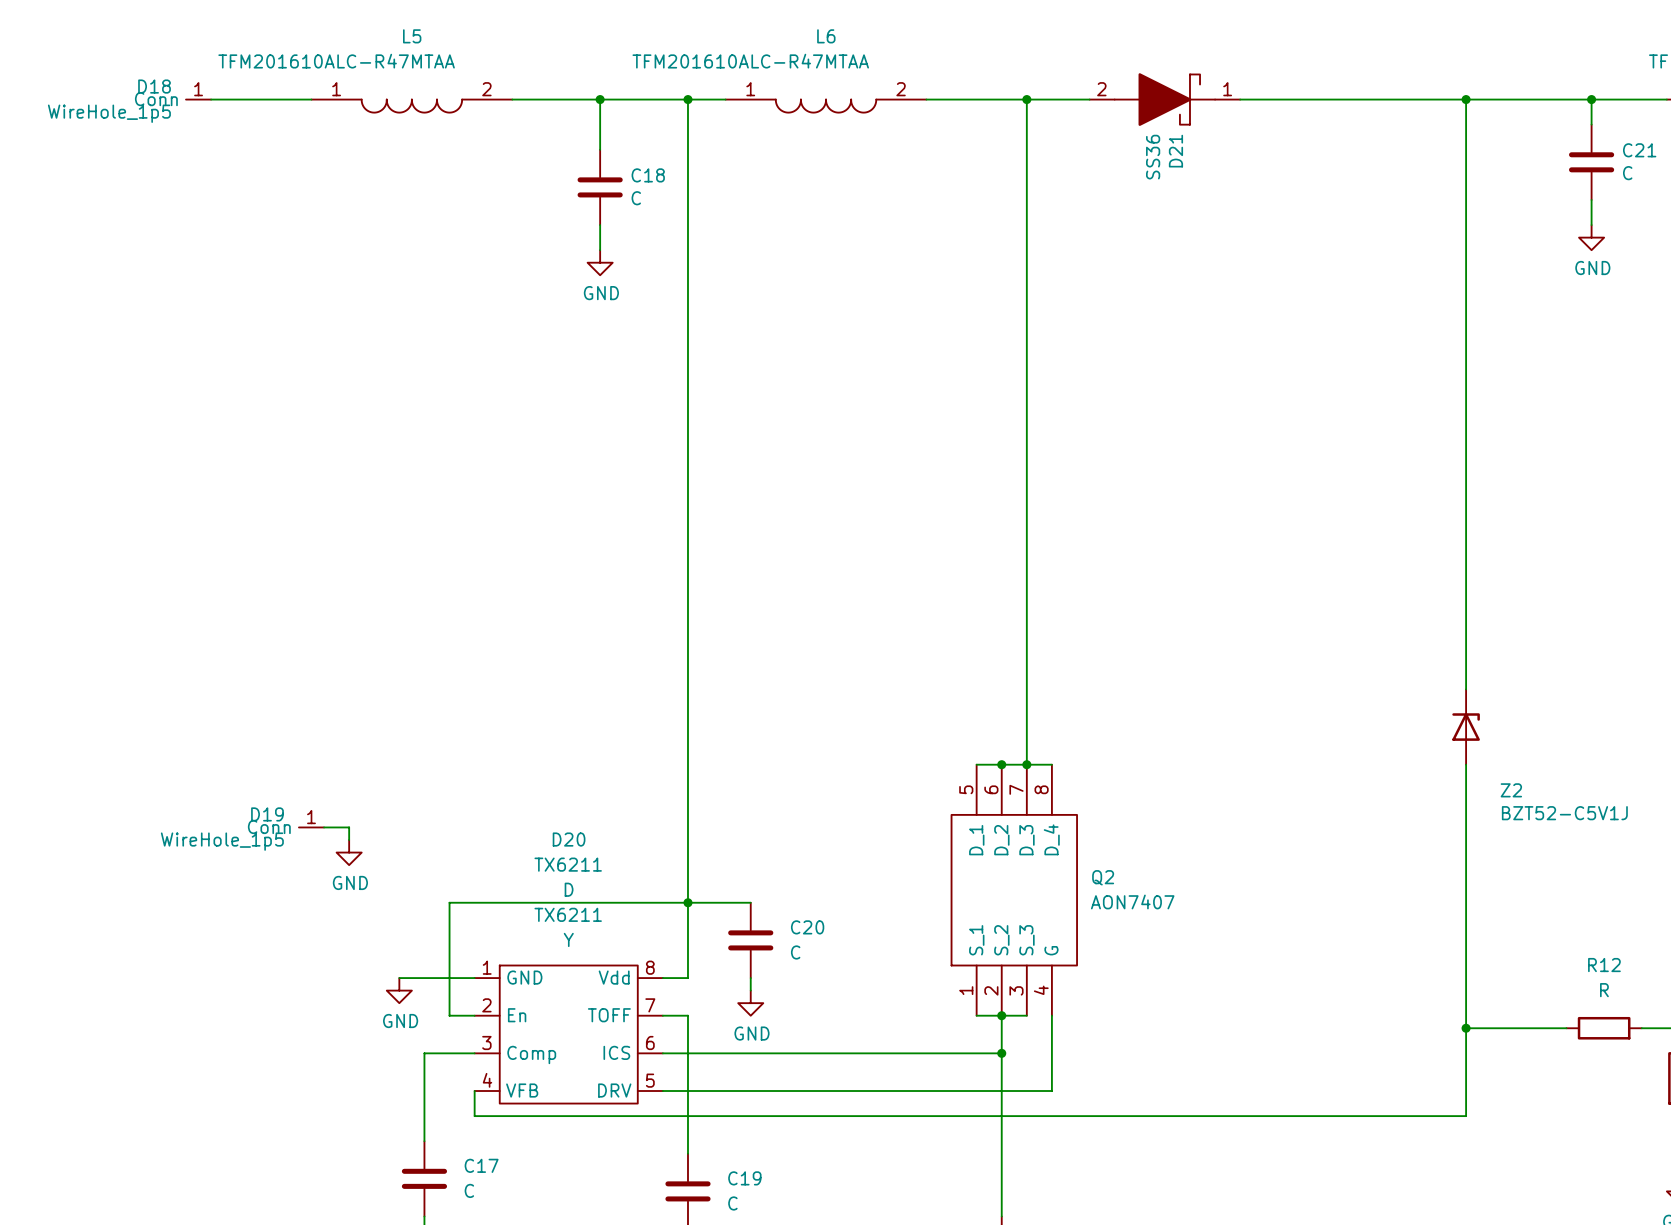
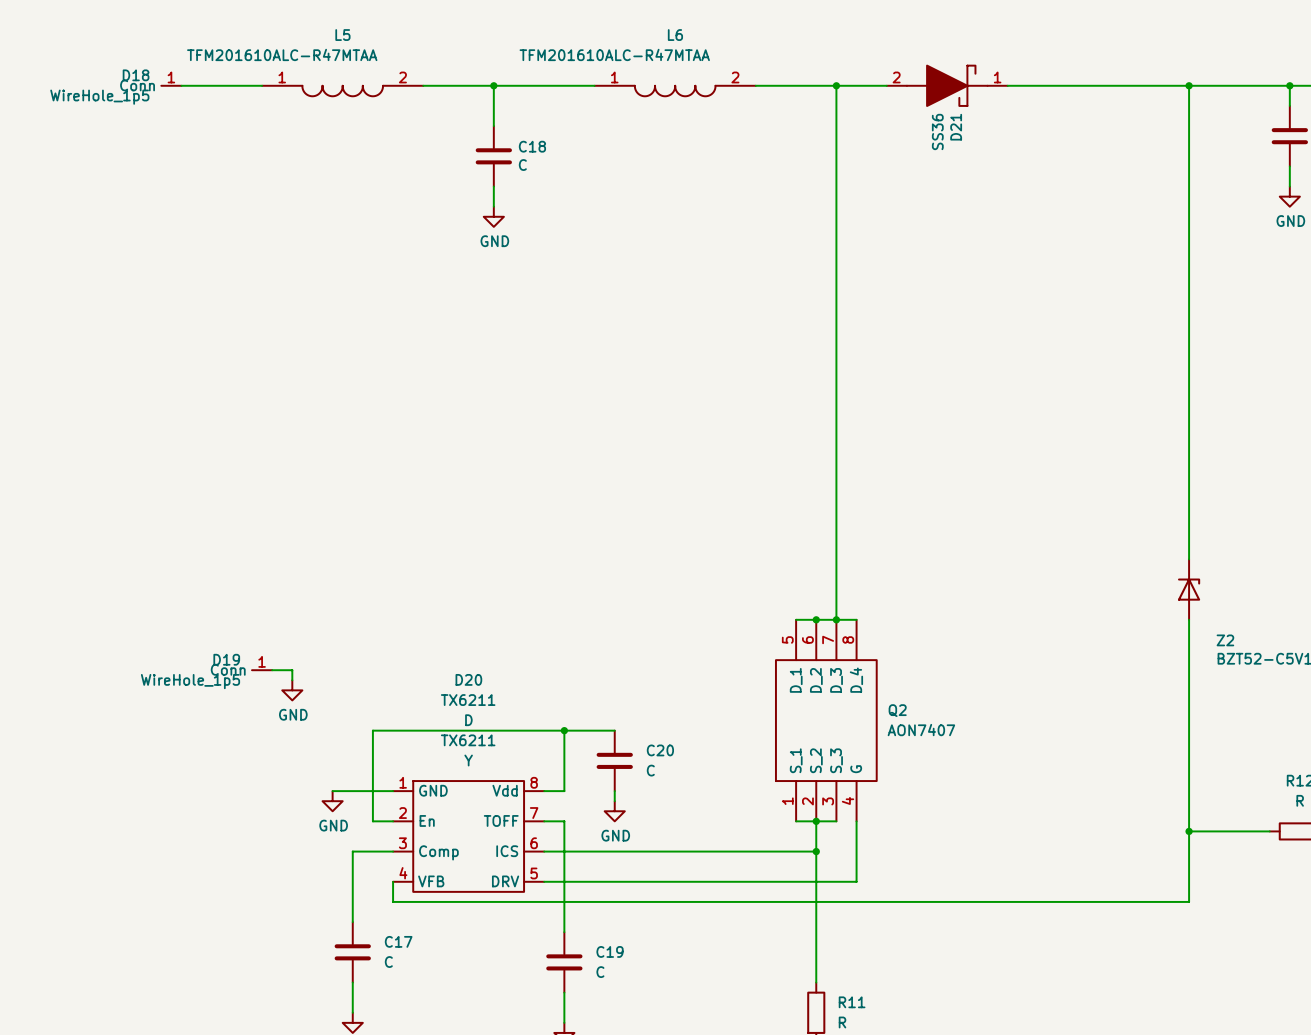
wire: (687, 99) (687, 902) -> none
junction: (687, 99) -> none

